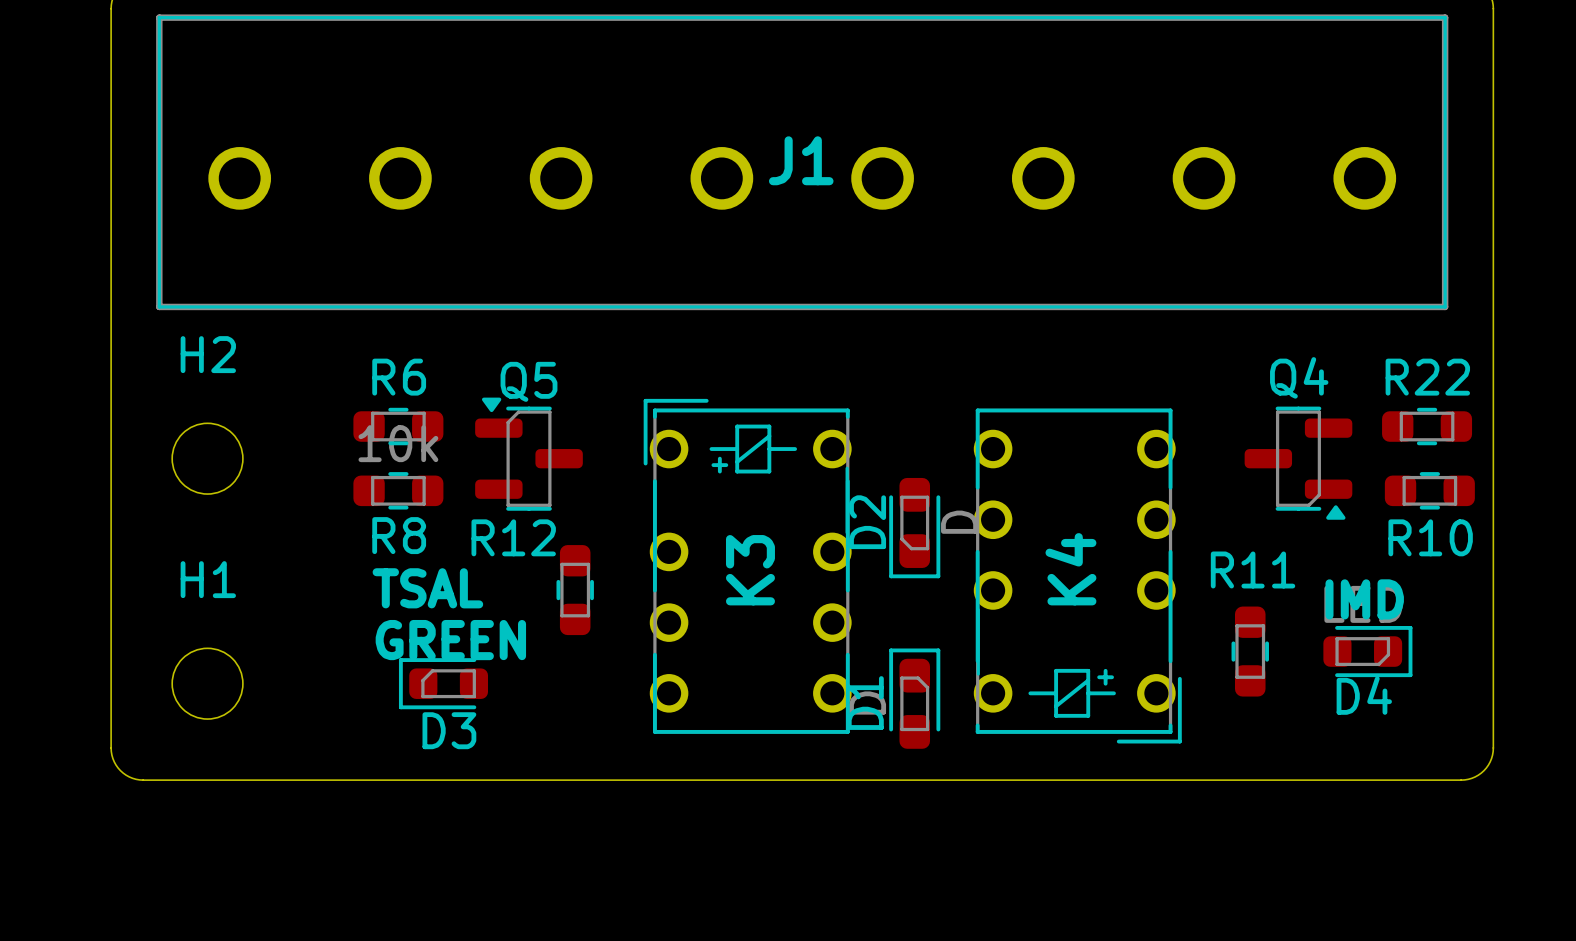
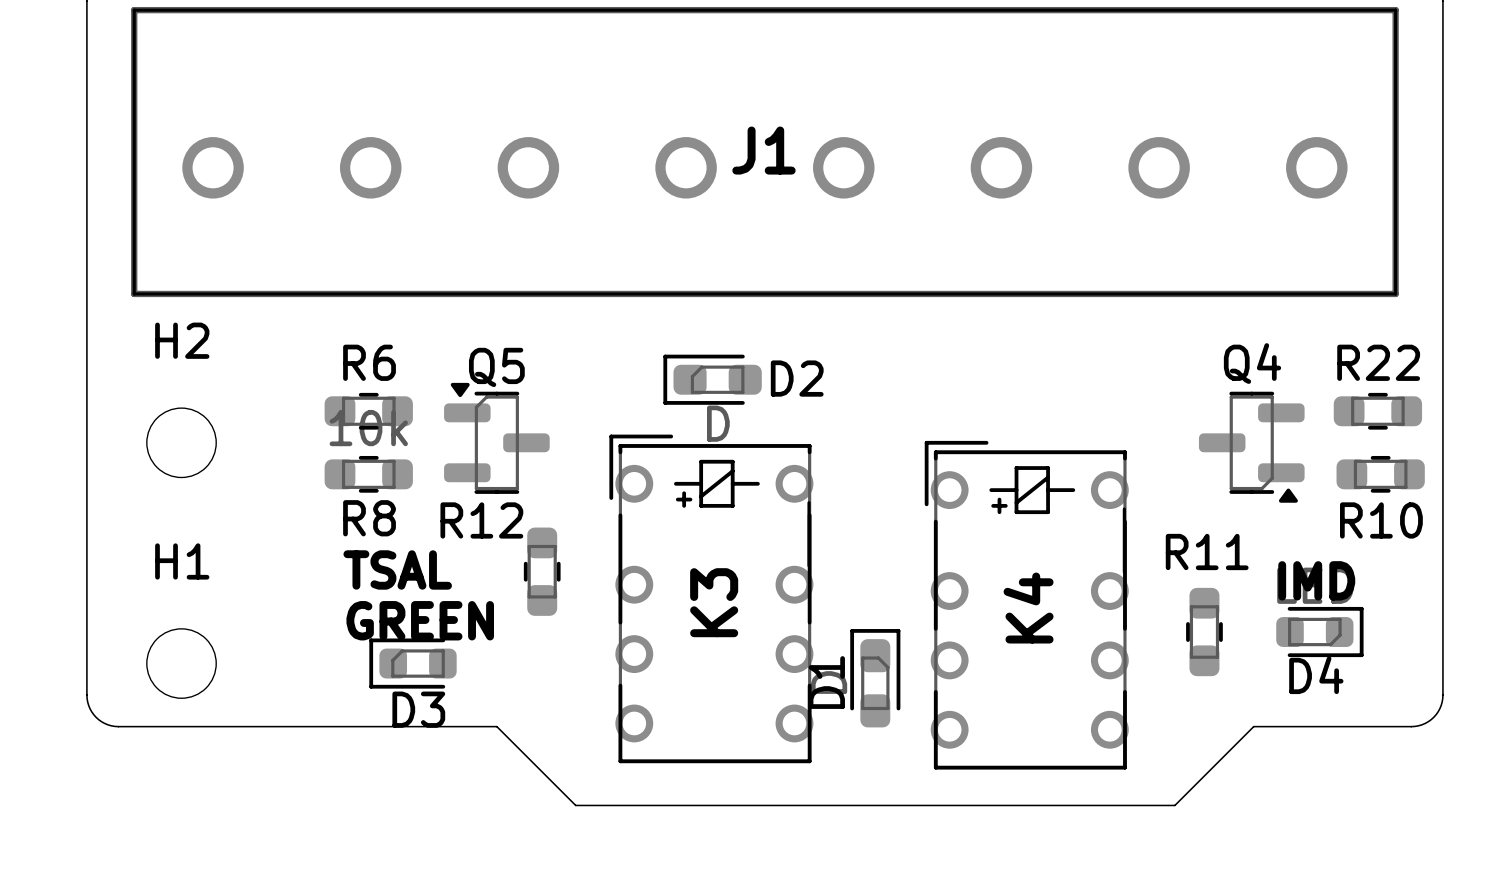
D2 name position: D2 (867, 522) -> D2 (797, 378)
D2 rotation: 0° (914, 528) -> 90° clockwise (712, 379)
D2 position: (914, 528) -> (712, 379)
K3 position: (747, 566) -> (711, 598)
K4 rotation: 0° (1077, 576) -> 180° (1026, 605)
board edge: (111, 715) (111, 751) (114, 761) (126, 775) (143, 780) (1461, 780) (1478, 775) (1490, 761) (1493, 751) (1493, 715) -> (86, 695) (90, 708) (96, 717) (104, 723) (114, 726) (496, 726) (575, 805) (1174, 805) (1253, 726) (1414, 726) (1425, 723) (1436, 714) (1441, 705) (1442, 695)

